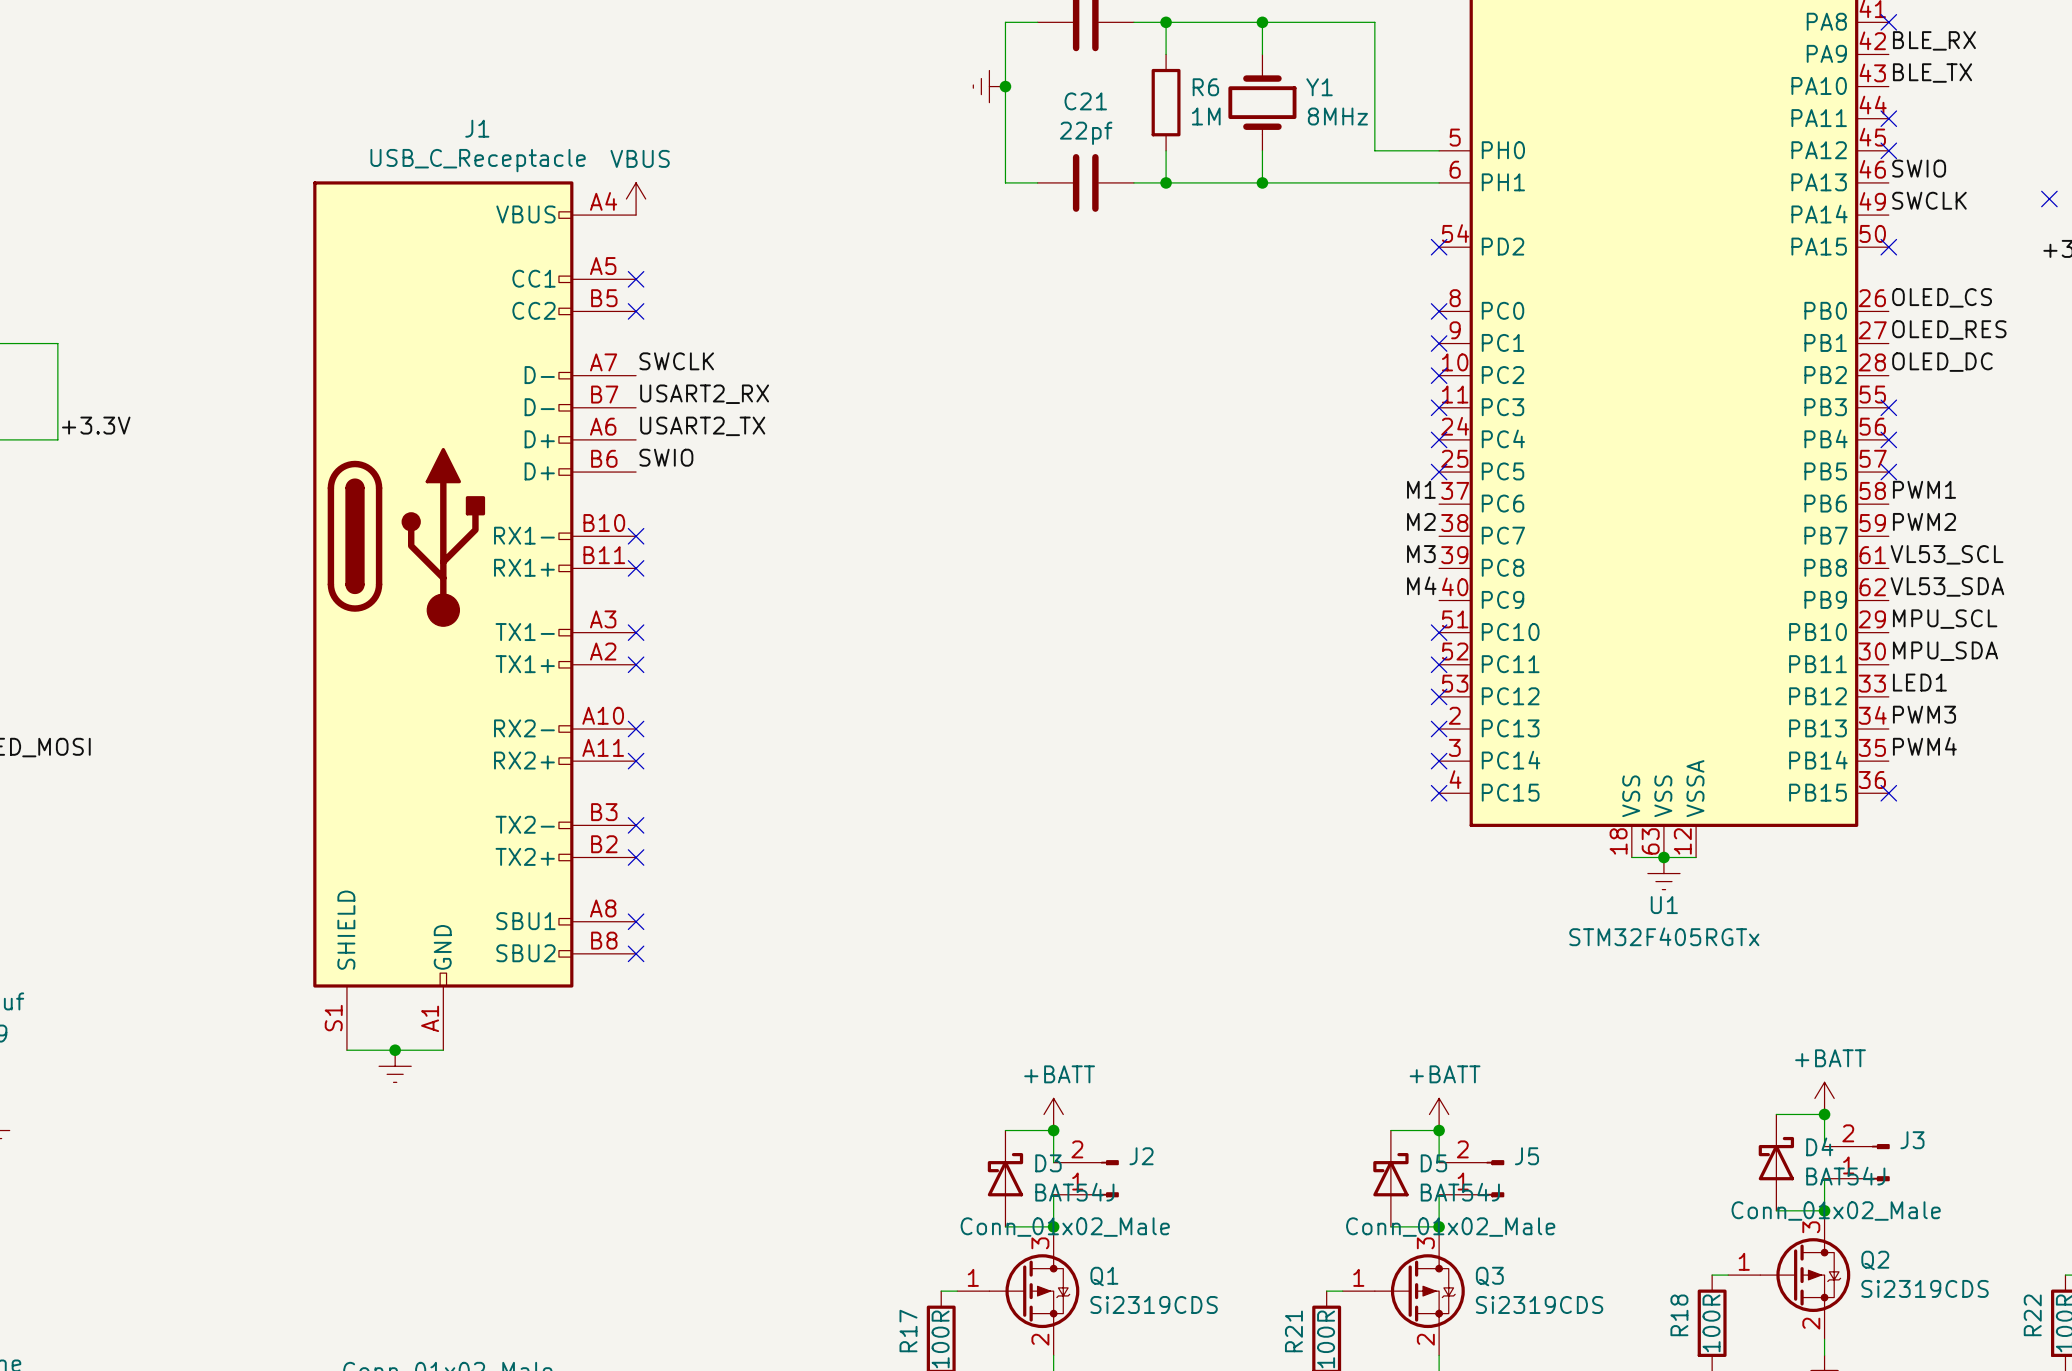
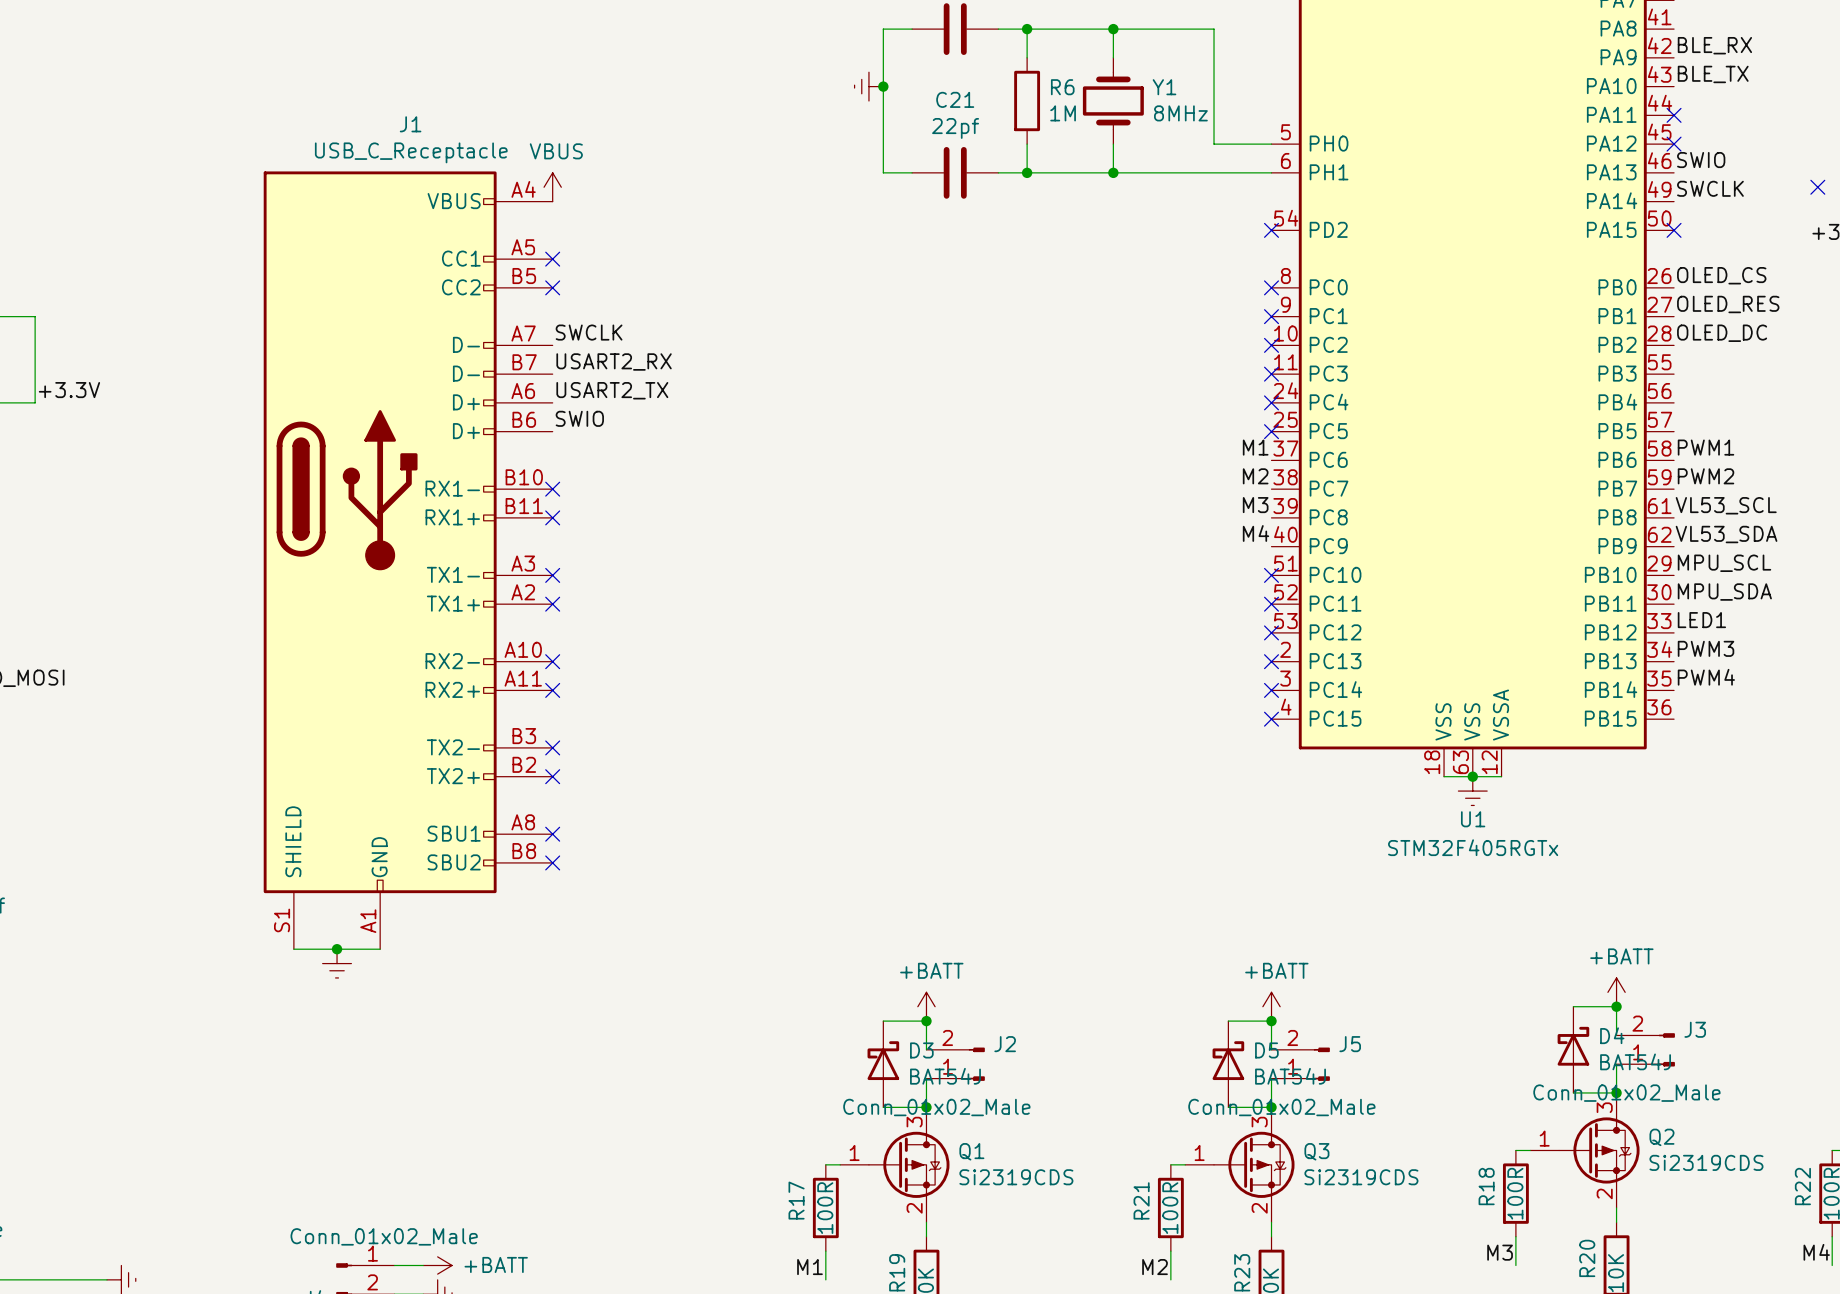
no-connect mark: (1888, 22) -> none
no-connect mark: (1888, 407) -> none
no-connect mark: (1888, 439) -> none
no-connect mark: (1888, 472) -> none
no-connect mark: (1888, 793) -> none

